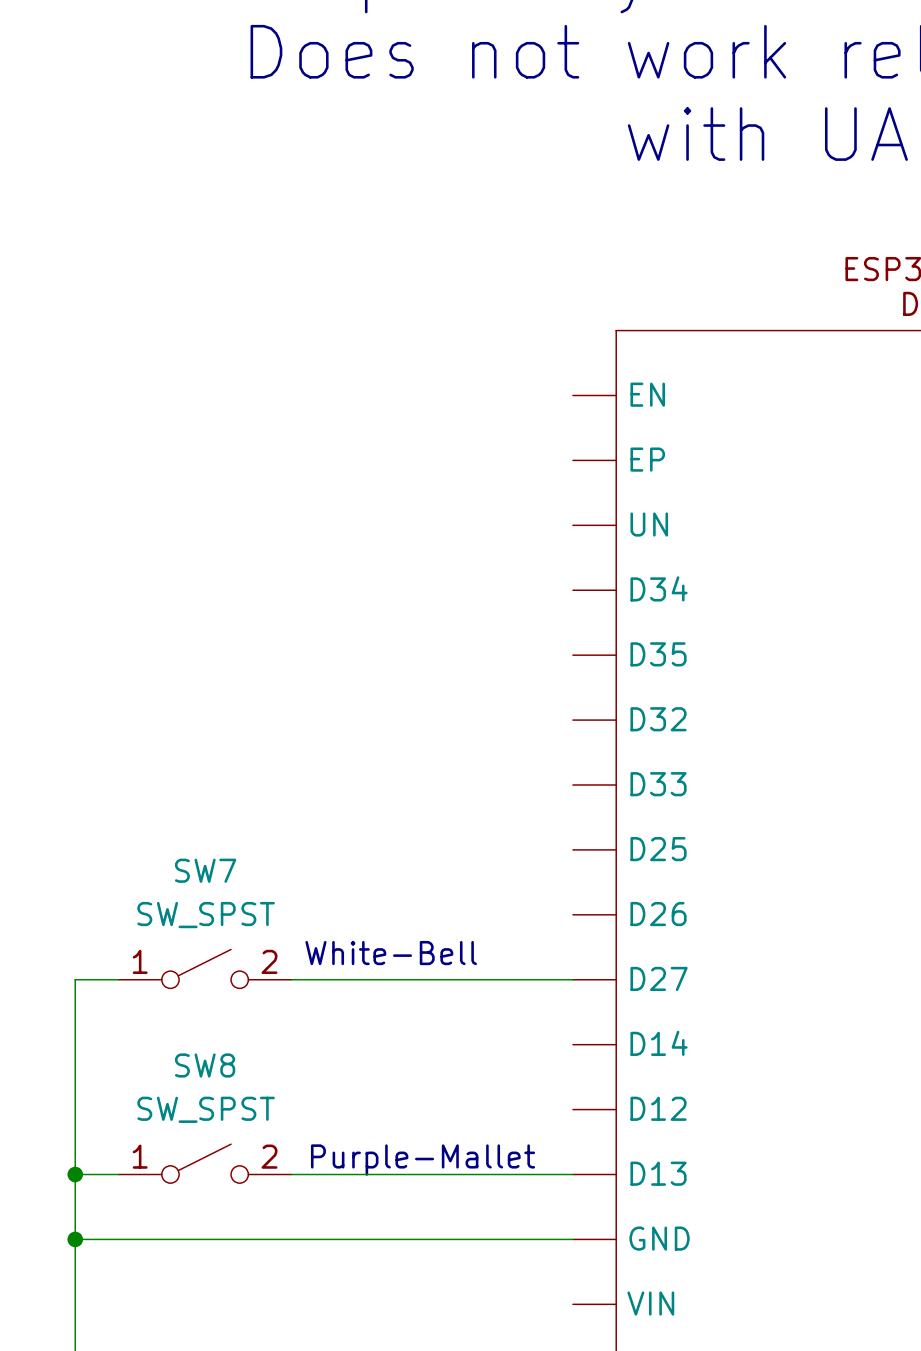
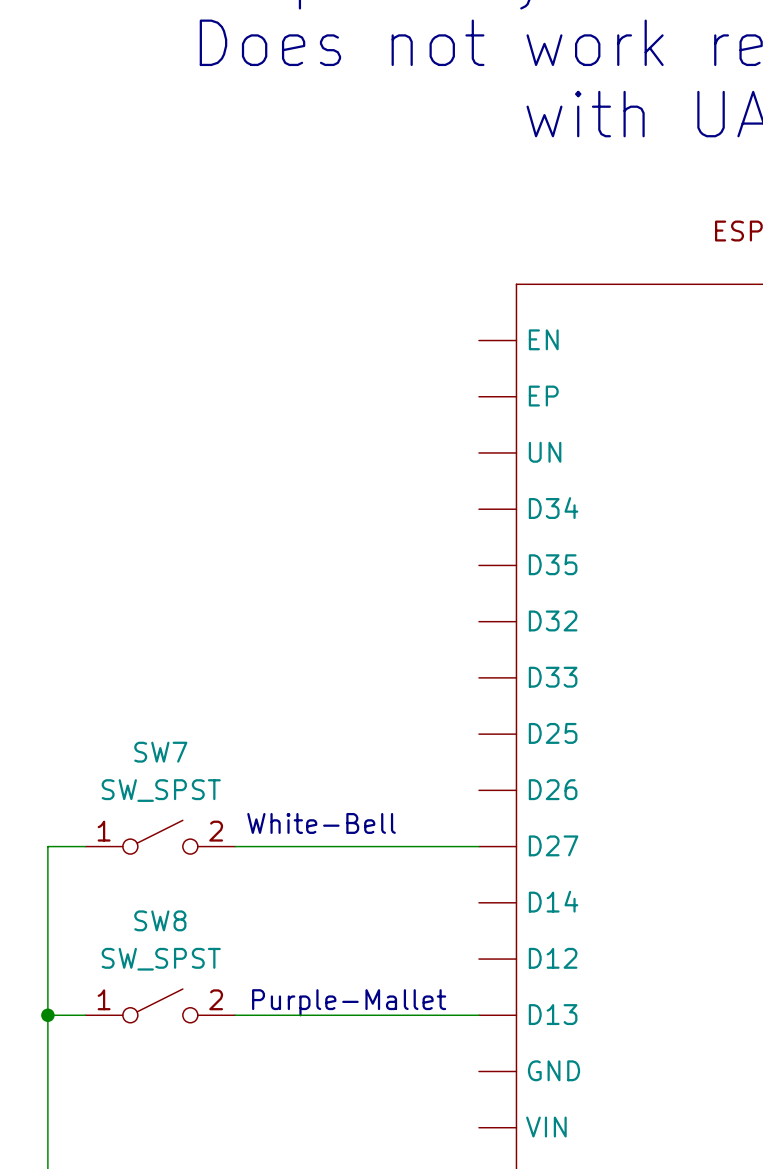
wire: (75, 1239) (572, 1239) -> none
junction: (75, 1239) -> none

